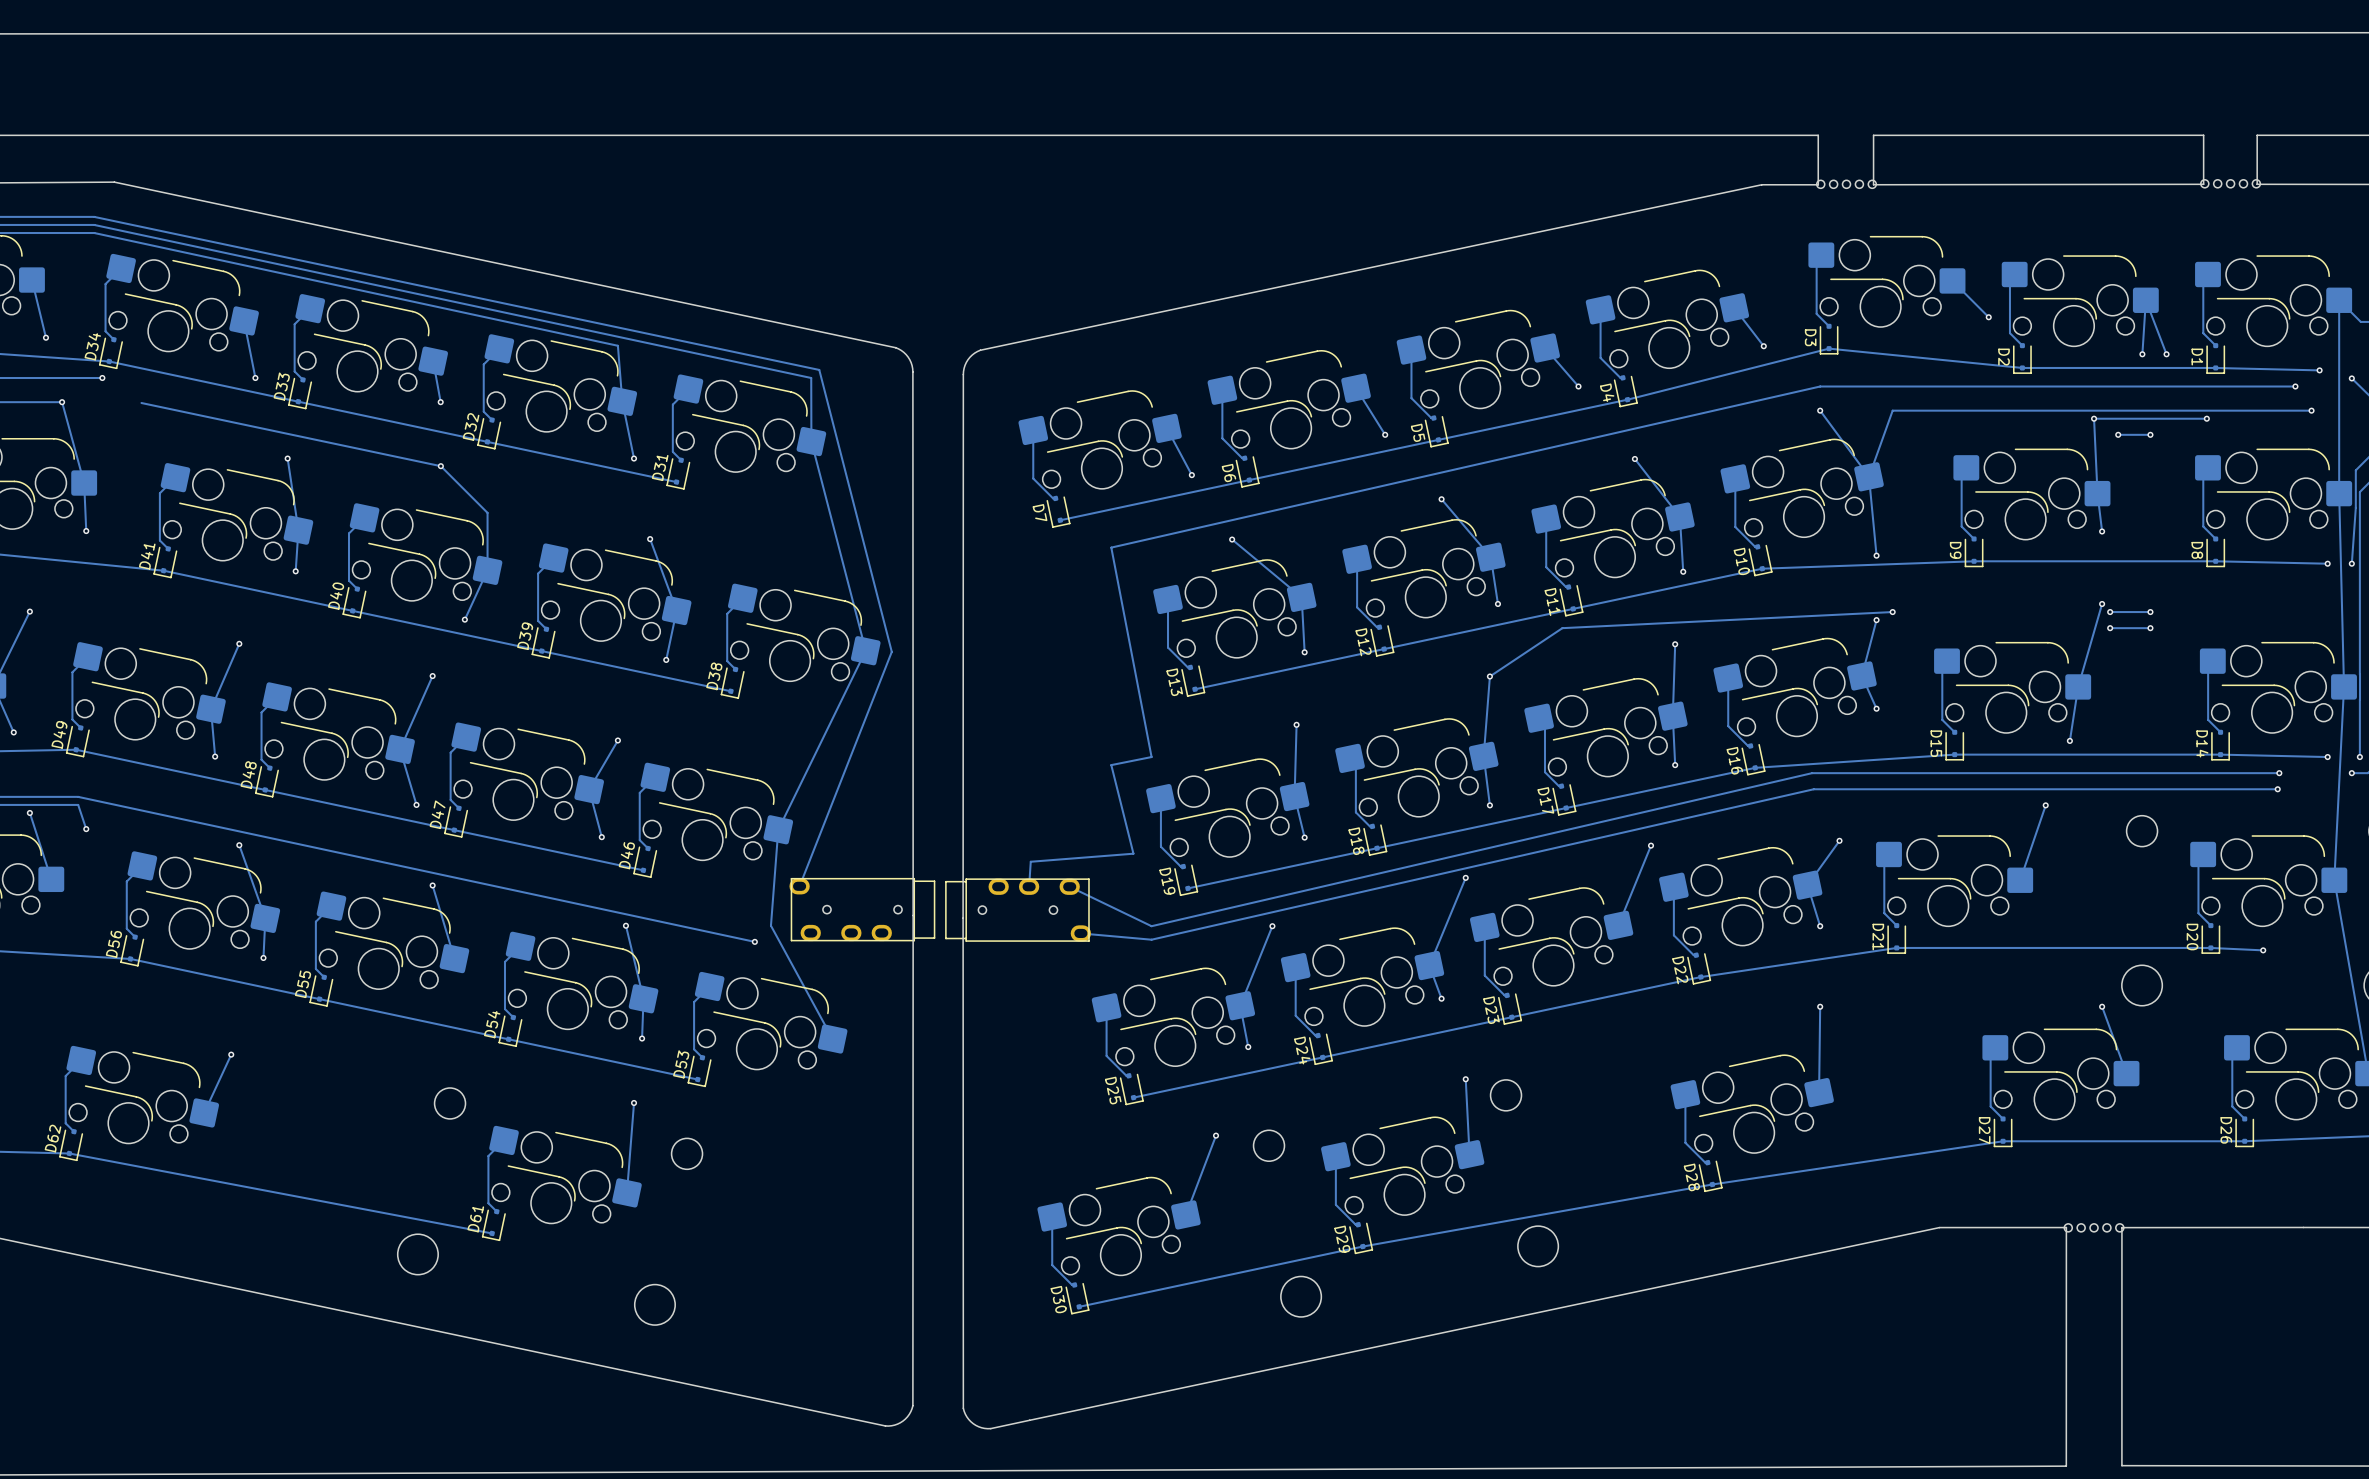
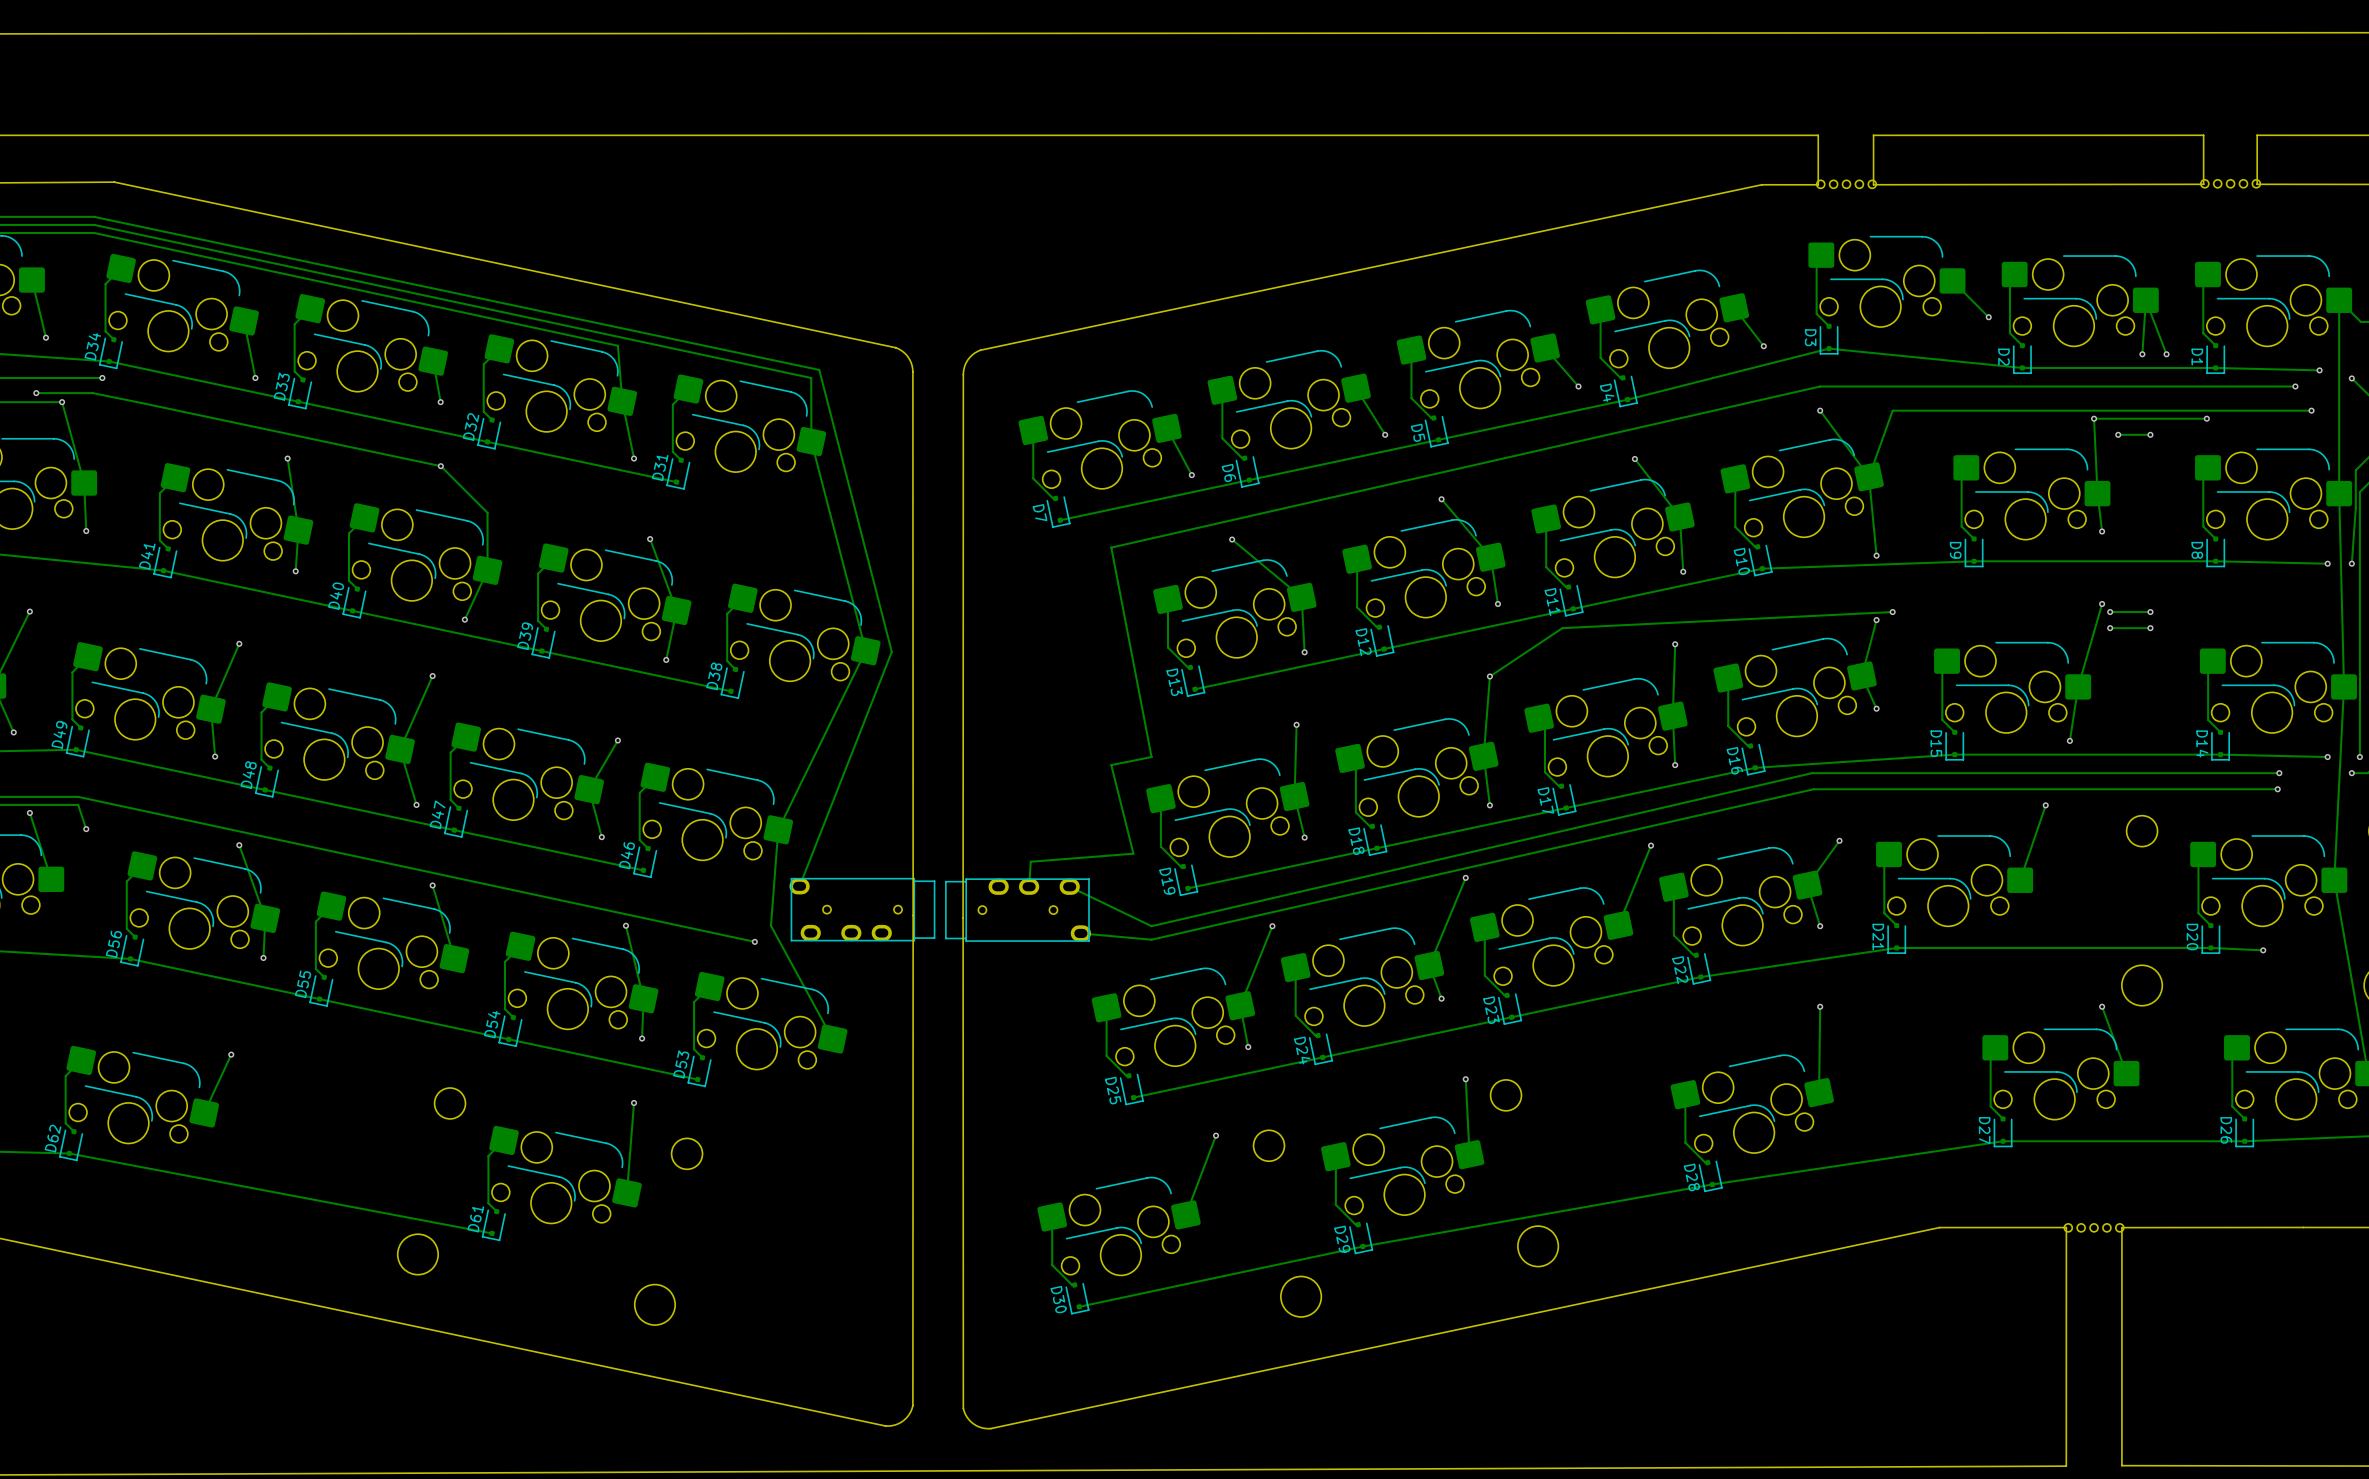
track: none -> (36, 393) (92, 393) (141, 403)
via: none -> (36, 393)

